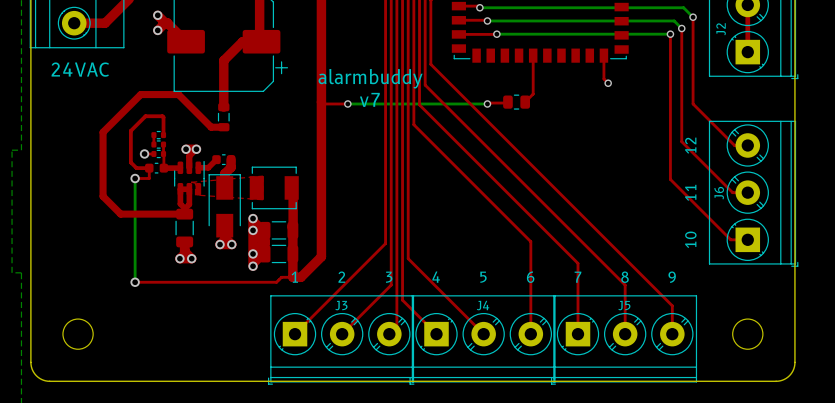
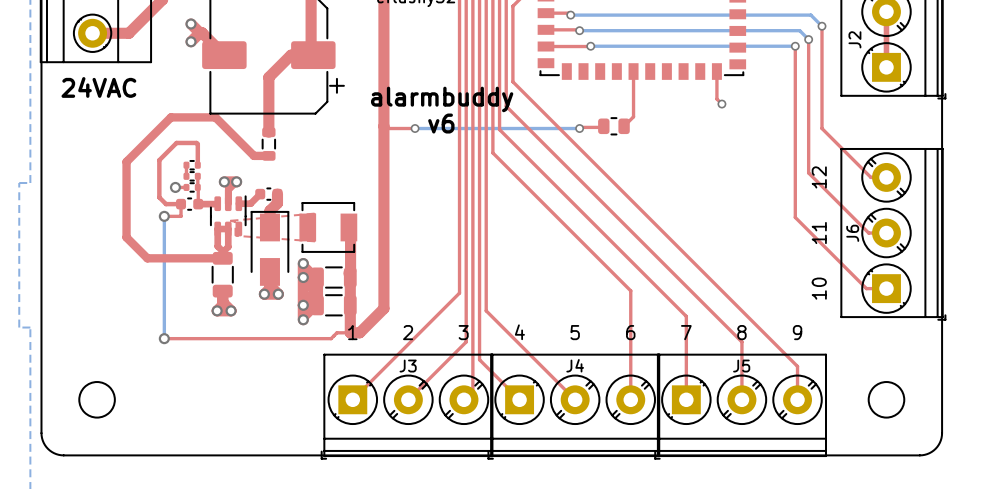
text: v7 (369, 99) -> v6 (441, 123)

